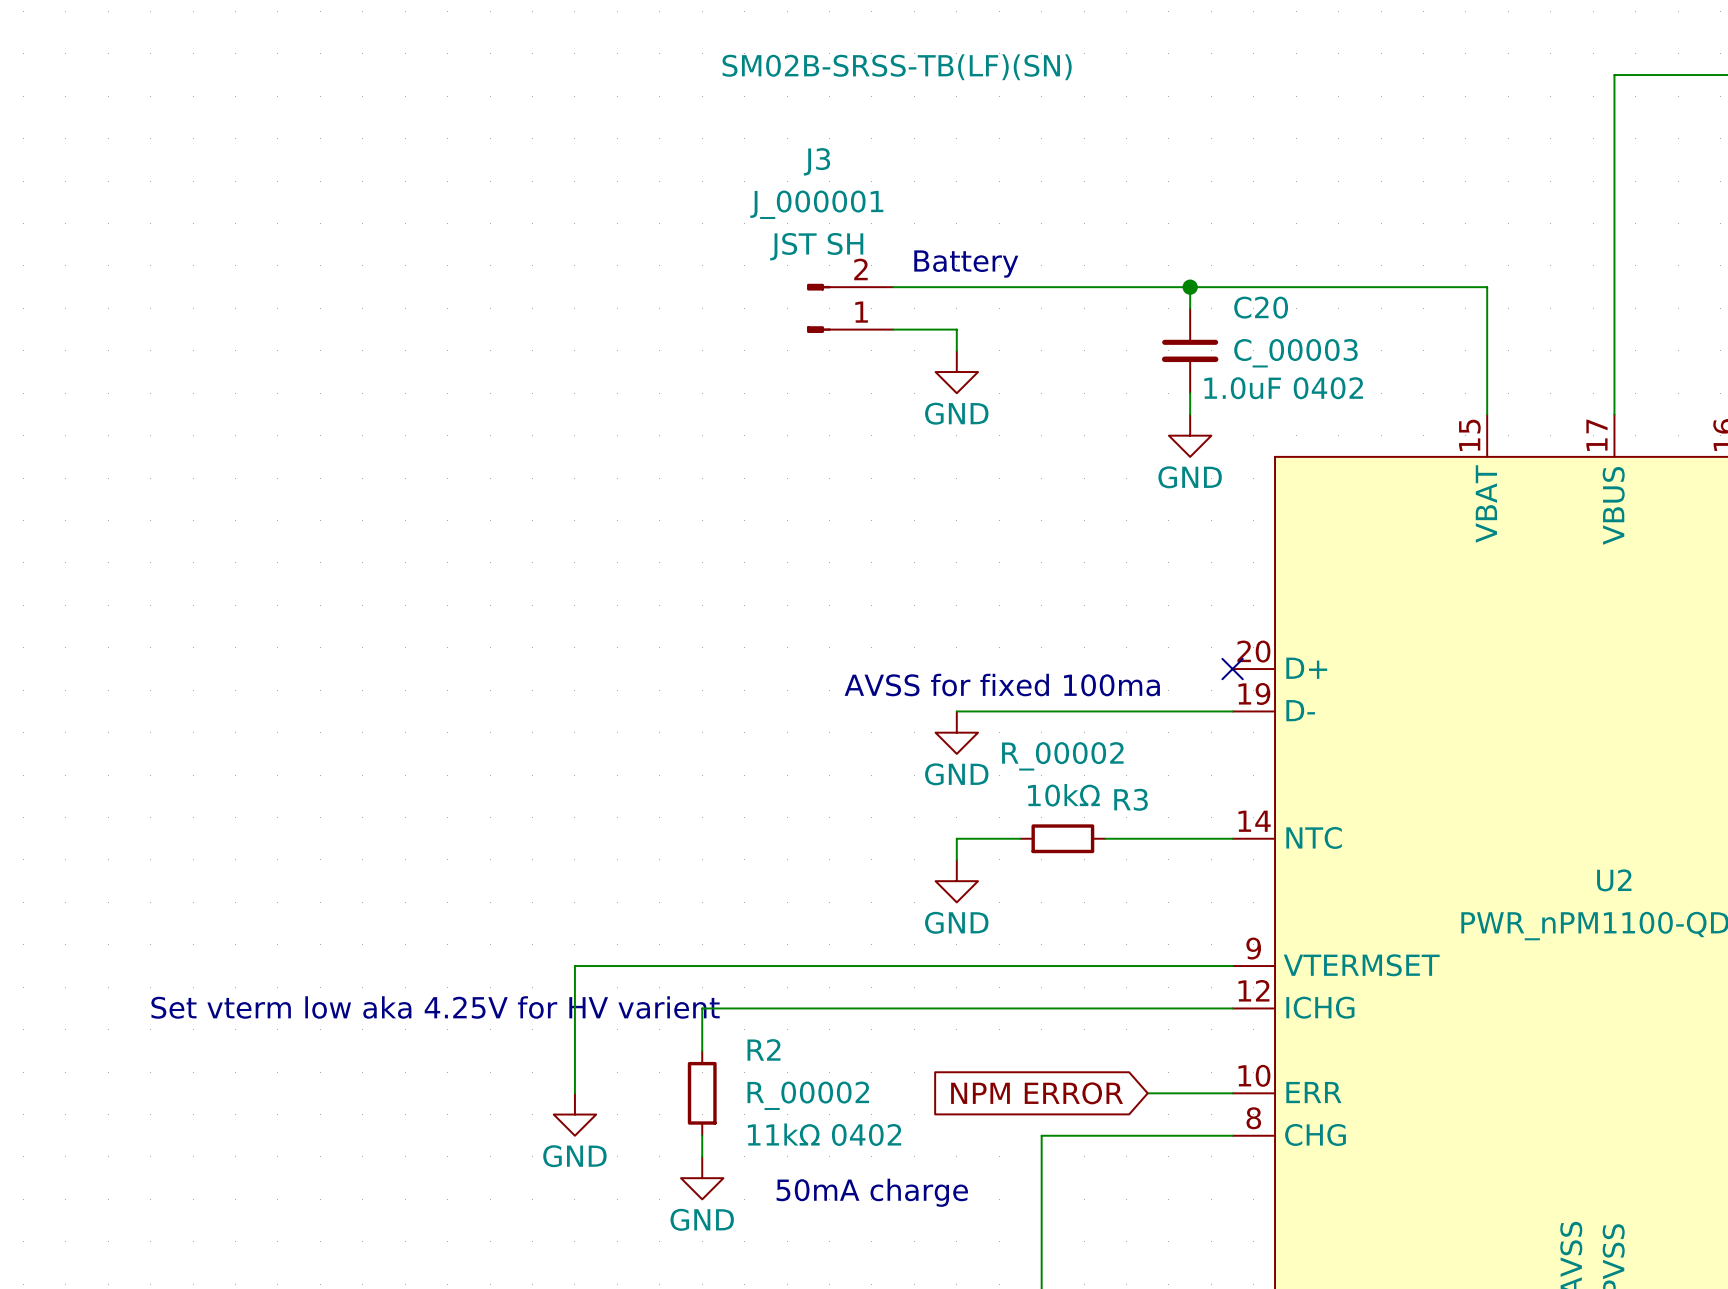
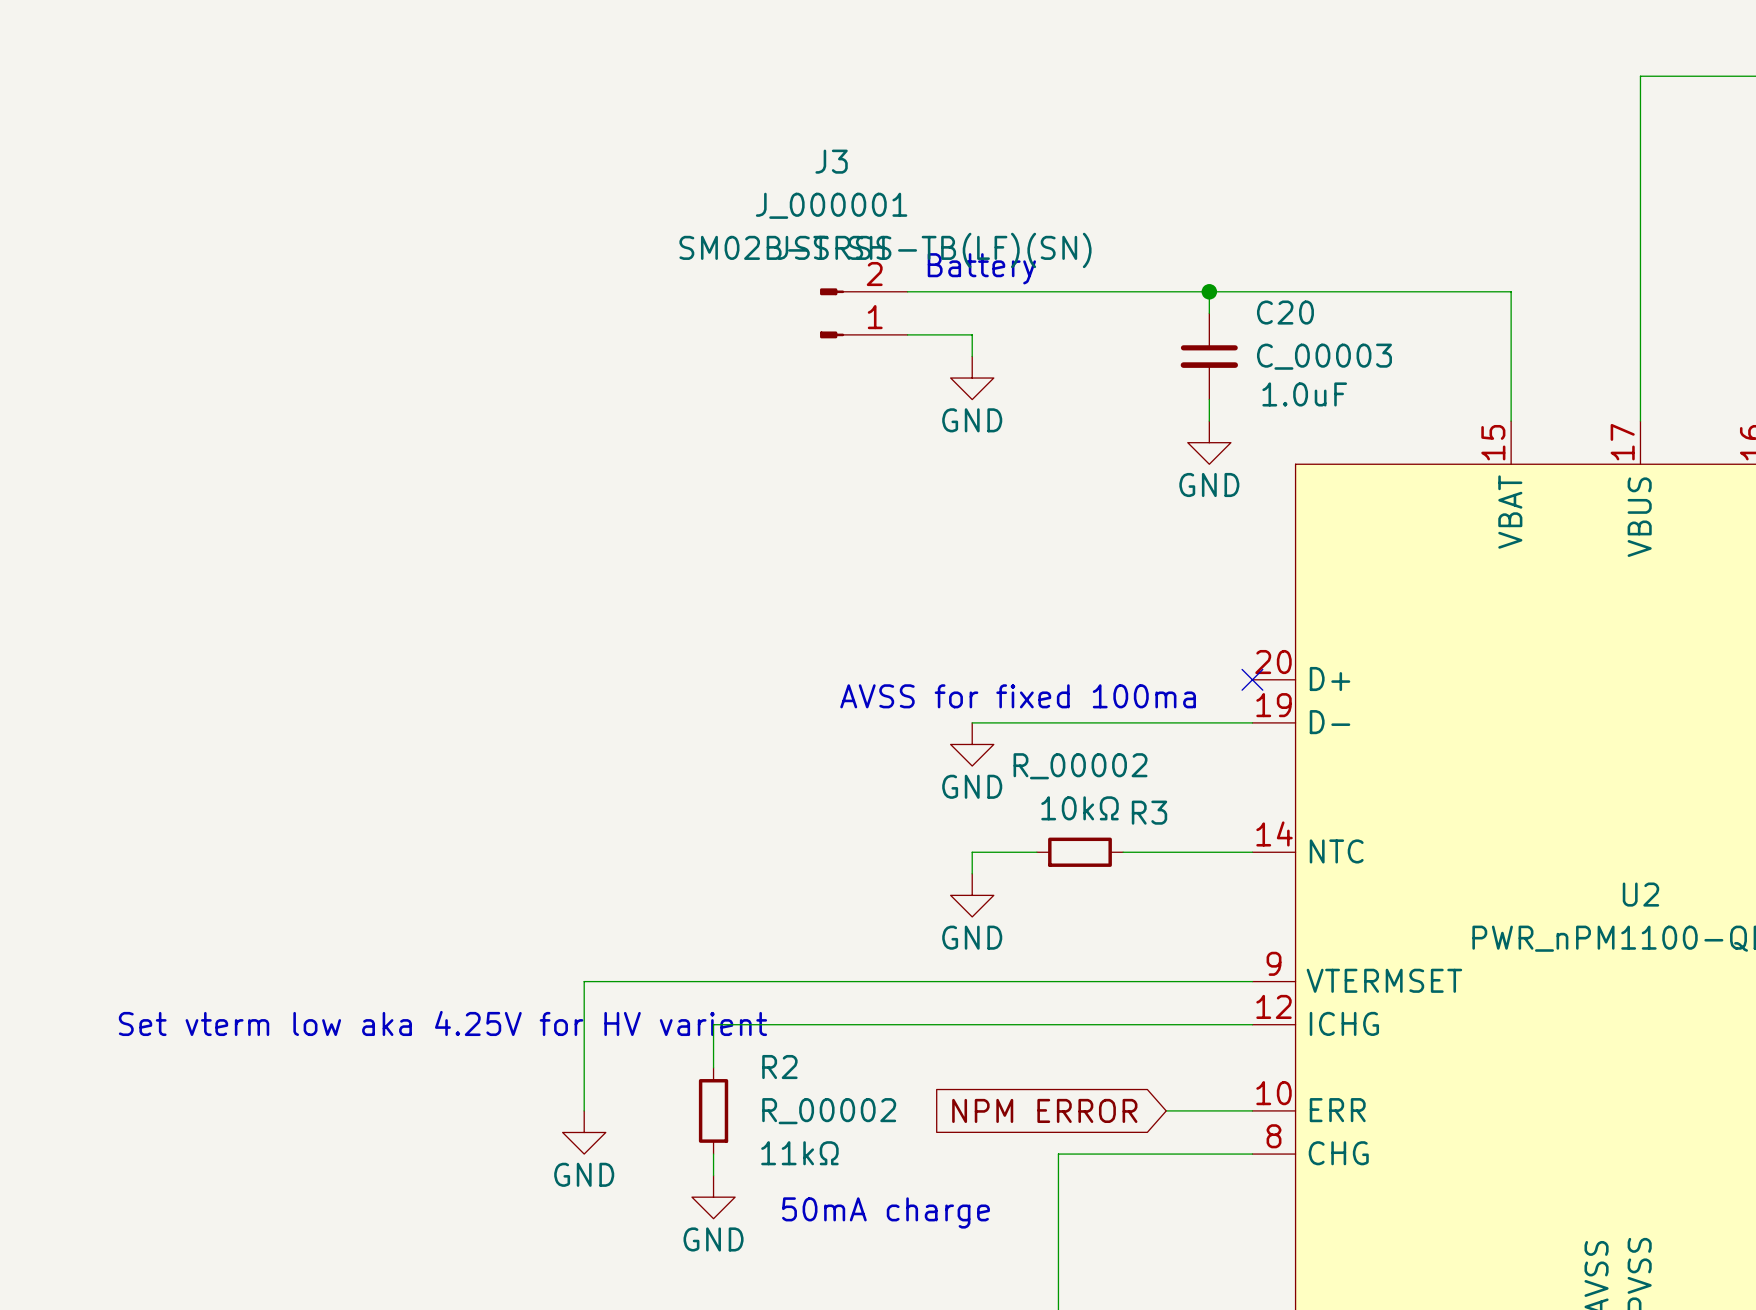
J3 text position: SM02B-SRSS-TB(LF)(SN) (897, 67) -> SM02B-SRSS-TB(LF)(SN) (885, 250)
C20 text: 1.0uF 0402 (1283, 388) -> 1.0uF (1304, 394)
R2 text: 11kΩ 0402 (824, 1134) -> 11kΩ (799, 1153)

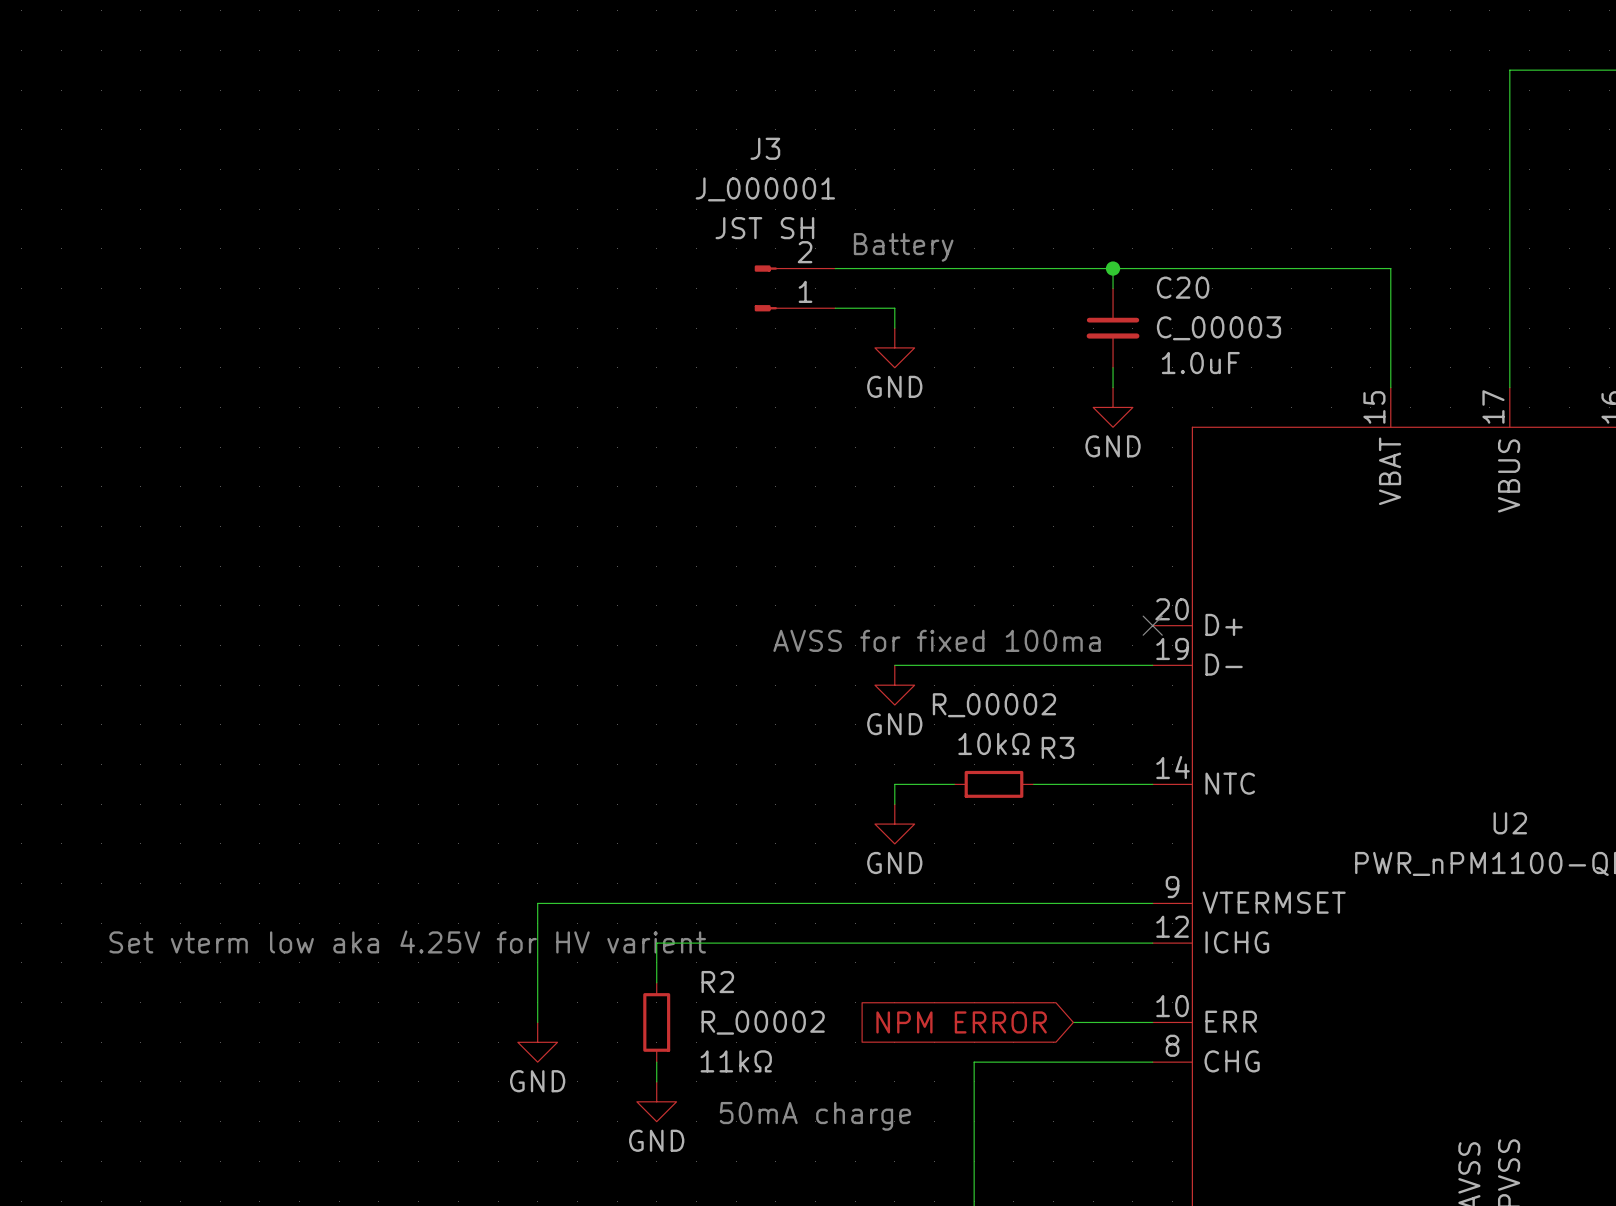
J3 text: SM02B-SRSS-TB(LF)(SN) (885, 250) -> none

